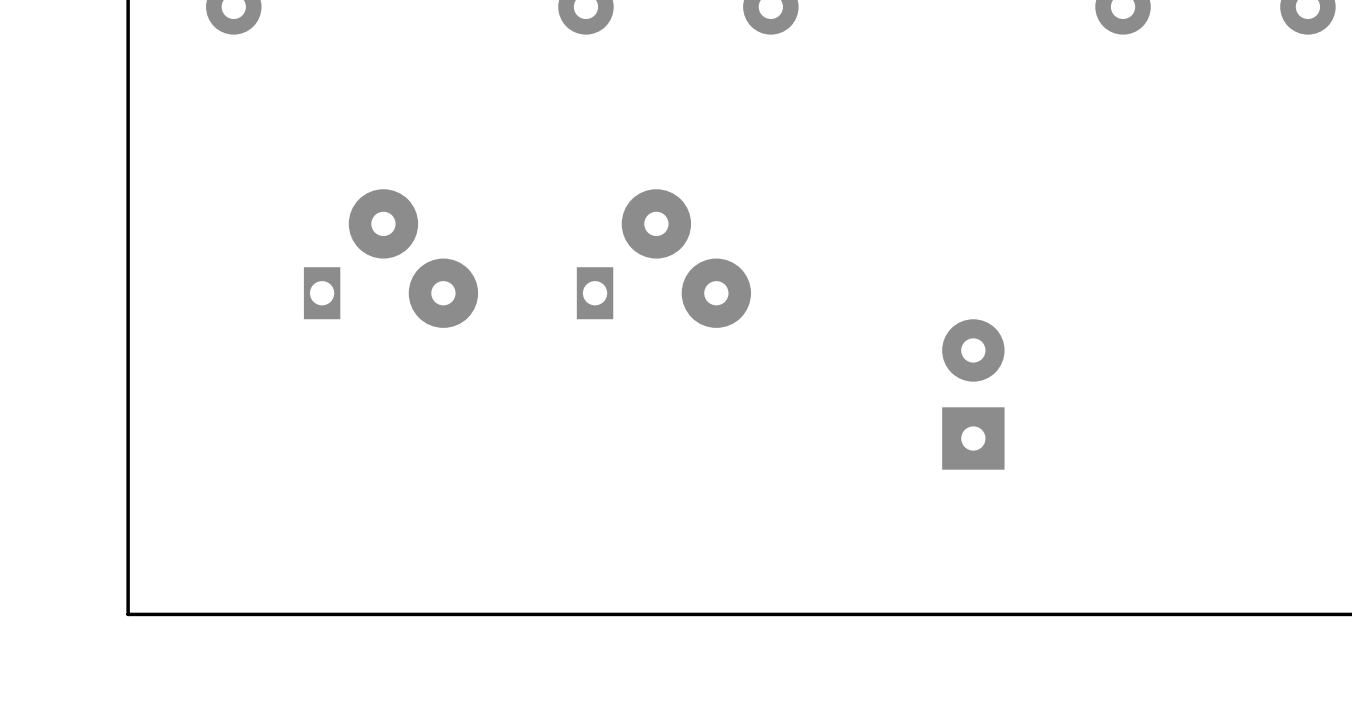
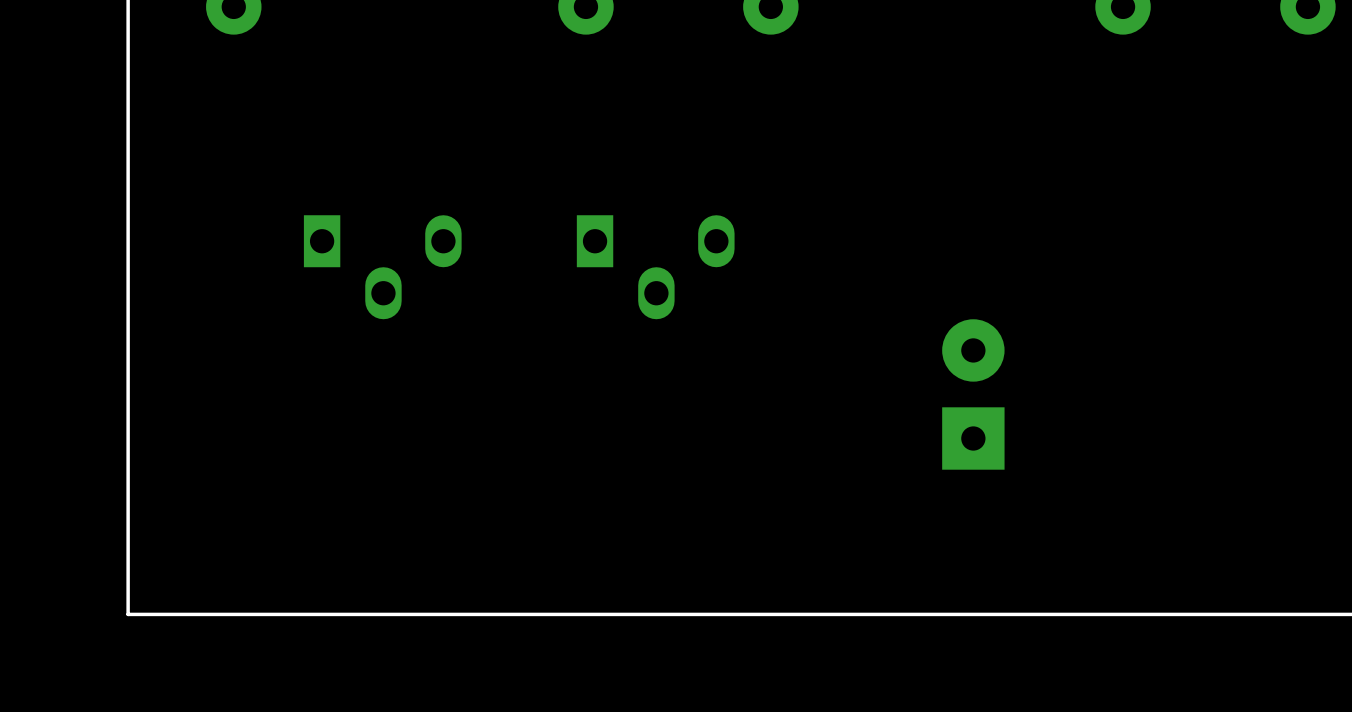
part footprint: [303, 189, 479, 328] -> [303, 215, 462, 320]
part footprint: [576, 189, 752, 328] -> [576, 215, 735, 320]

